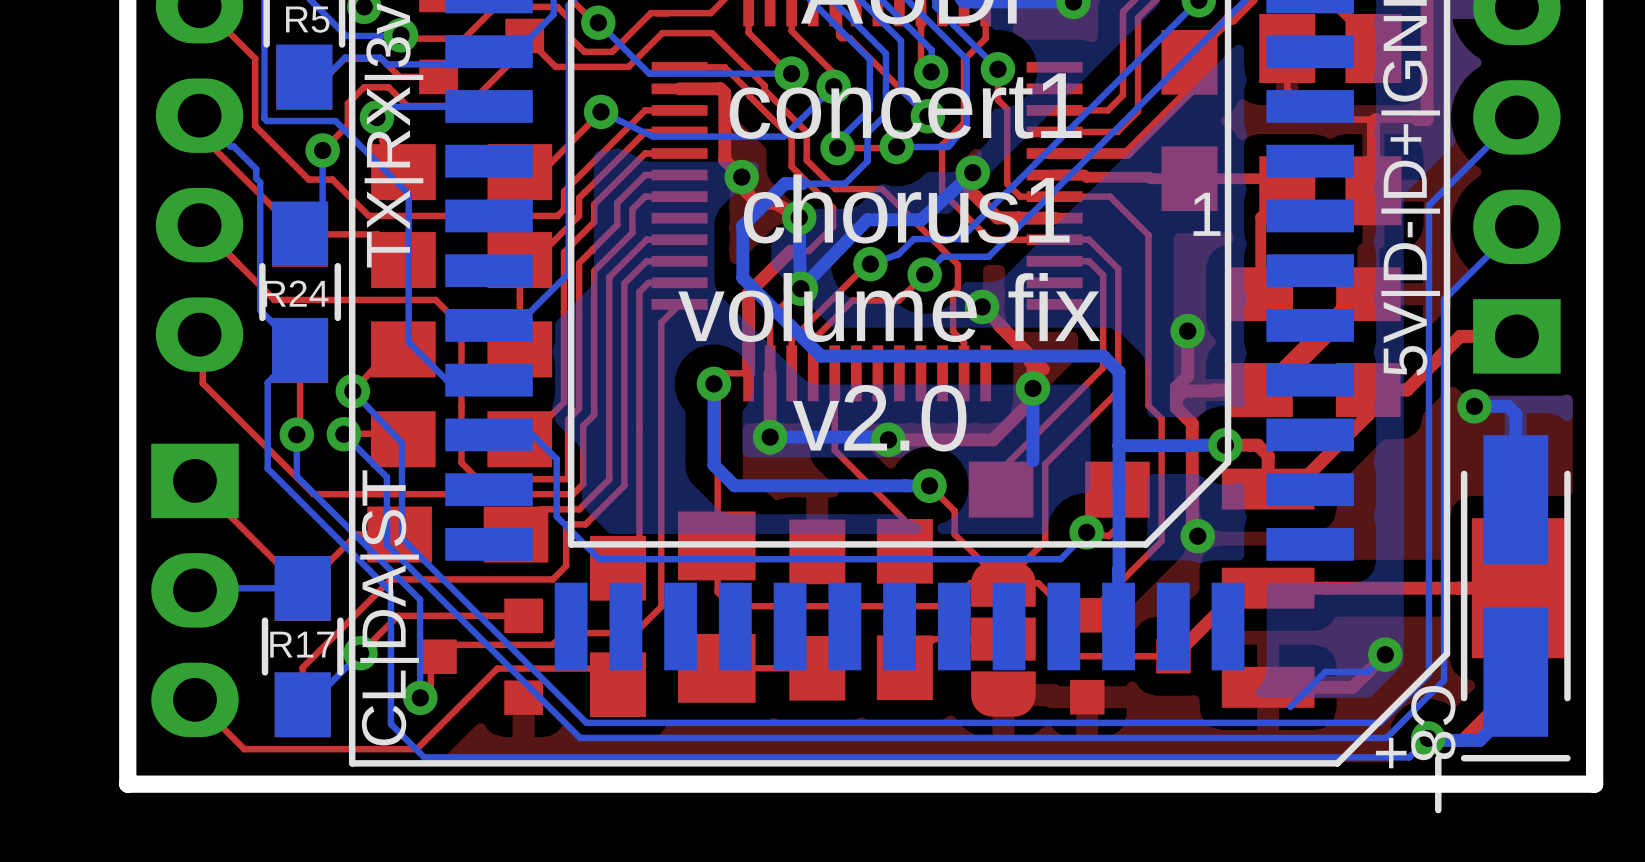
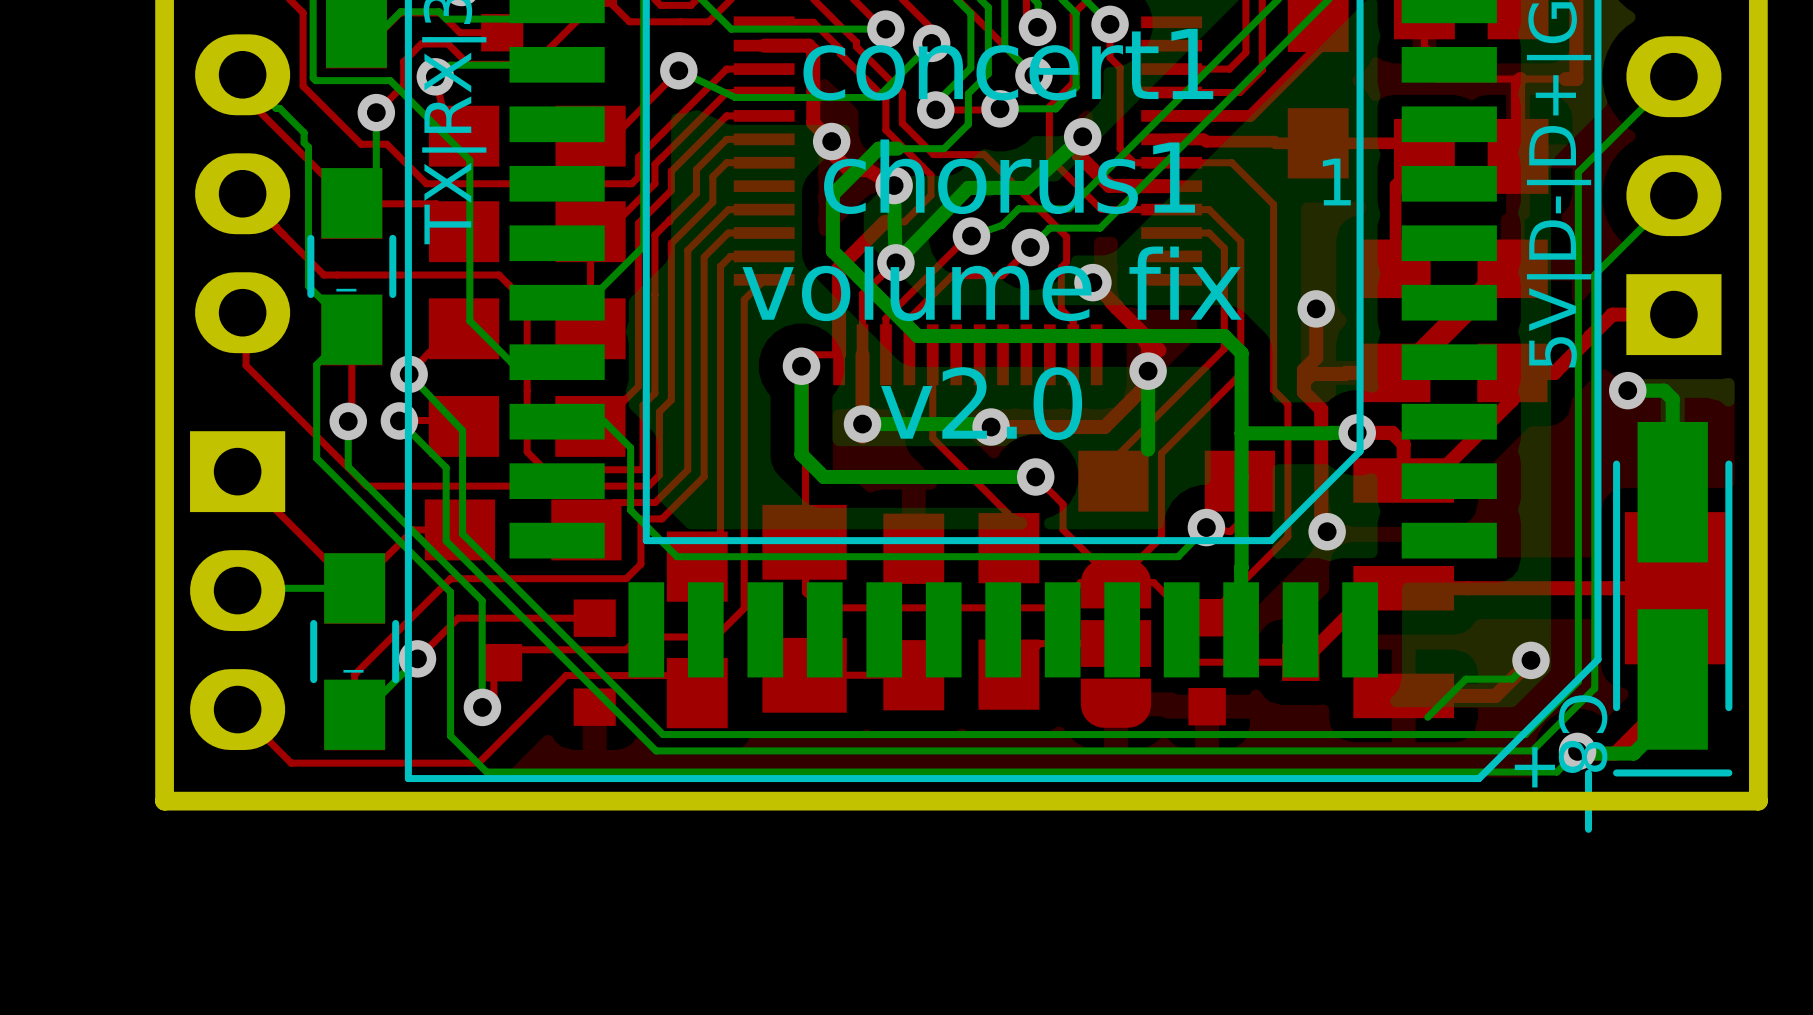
R24 name: R24 (296, 293) -> _ (346, 290)
text: CL|DA|ST (389, 607) -> none
R17 name: R17 (302, 644) -> _ (353, 671)

